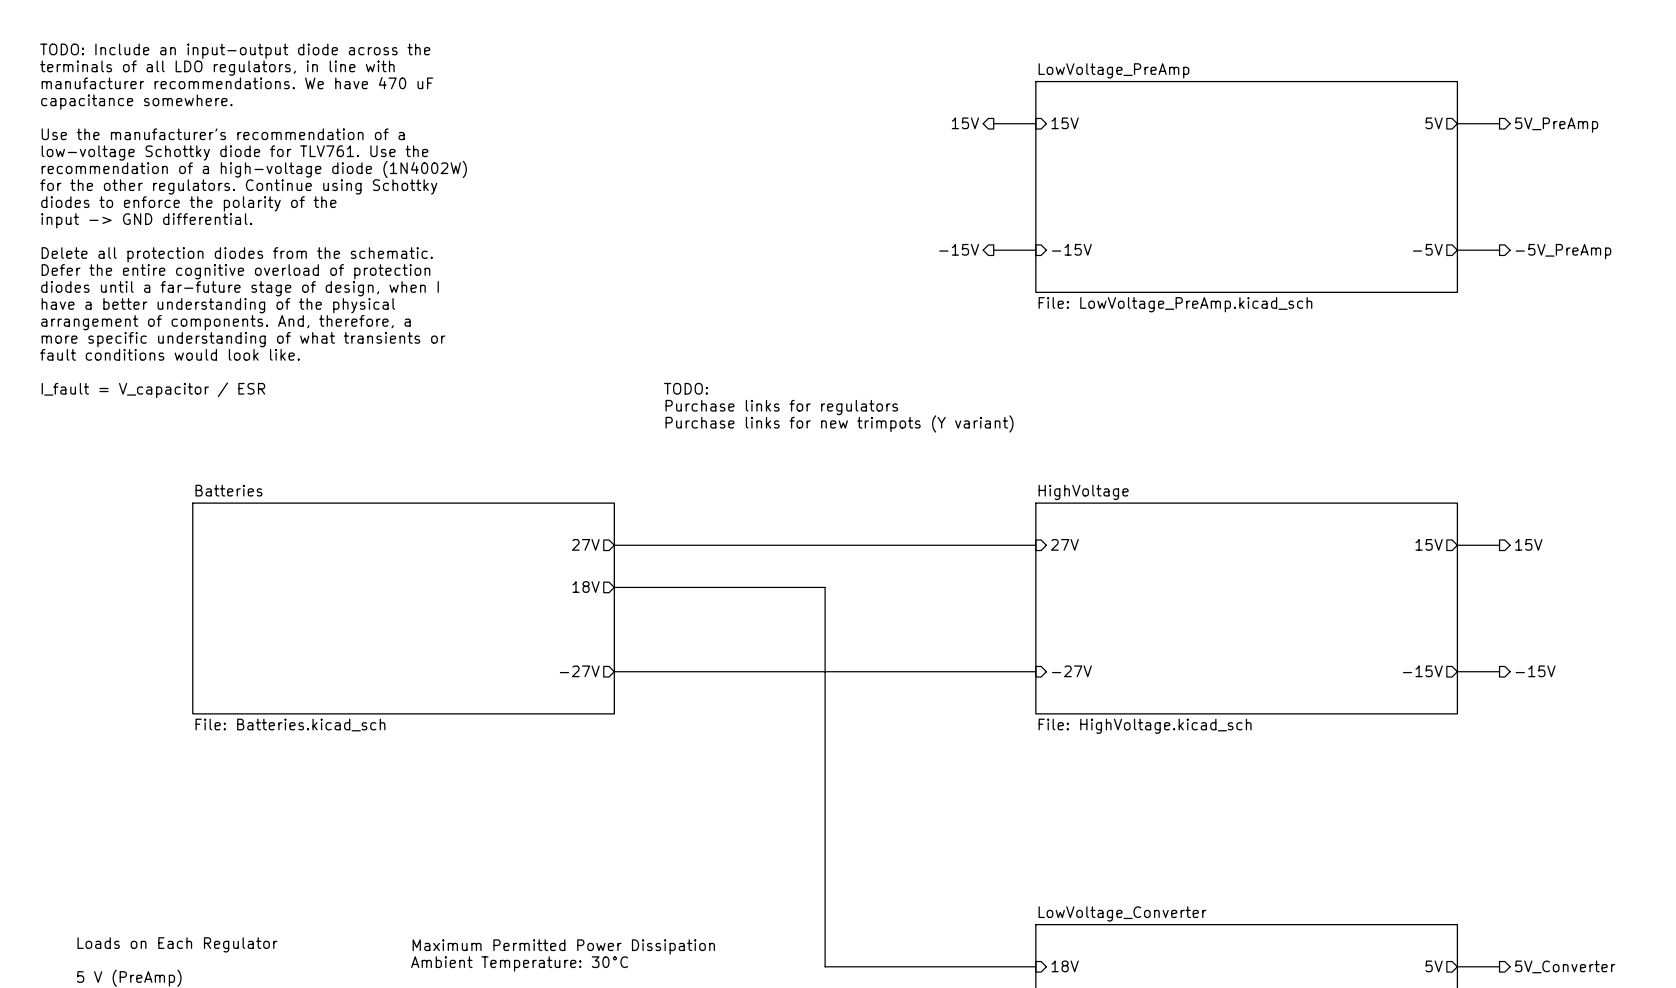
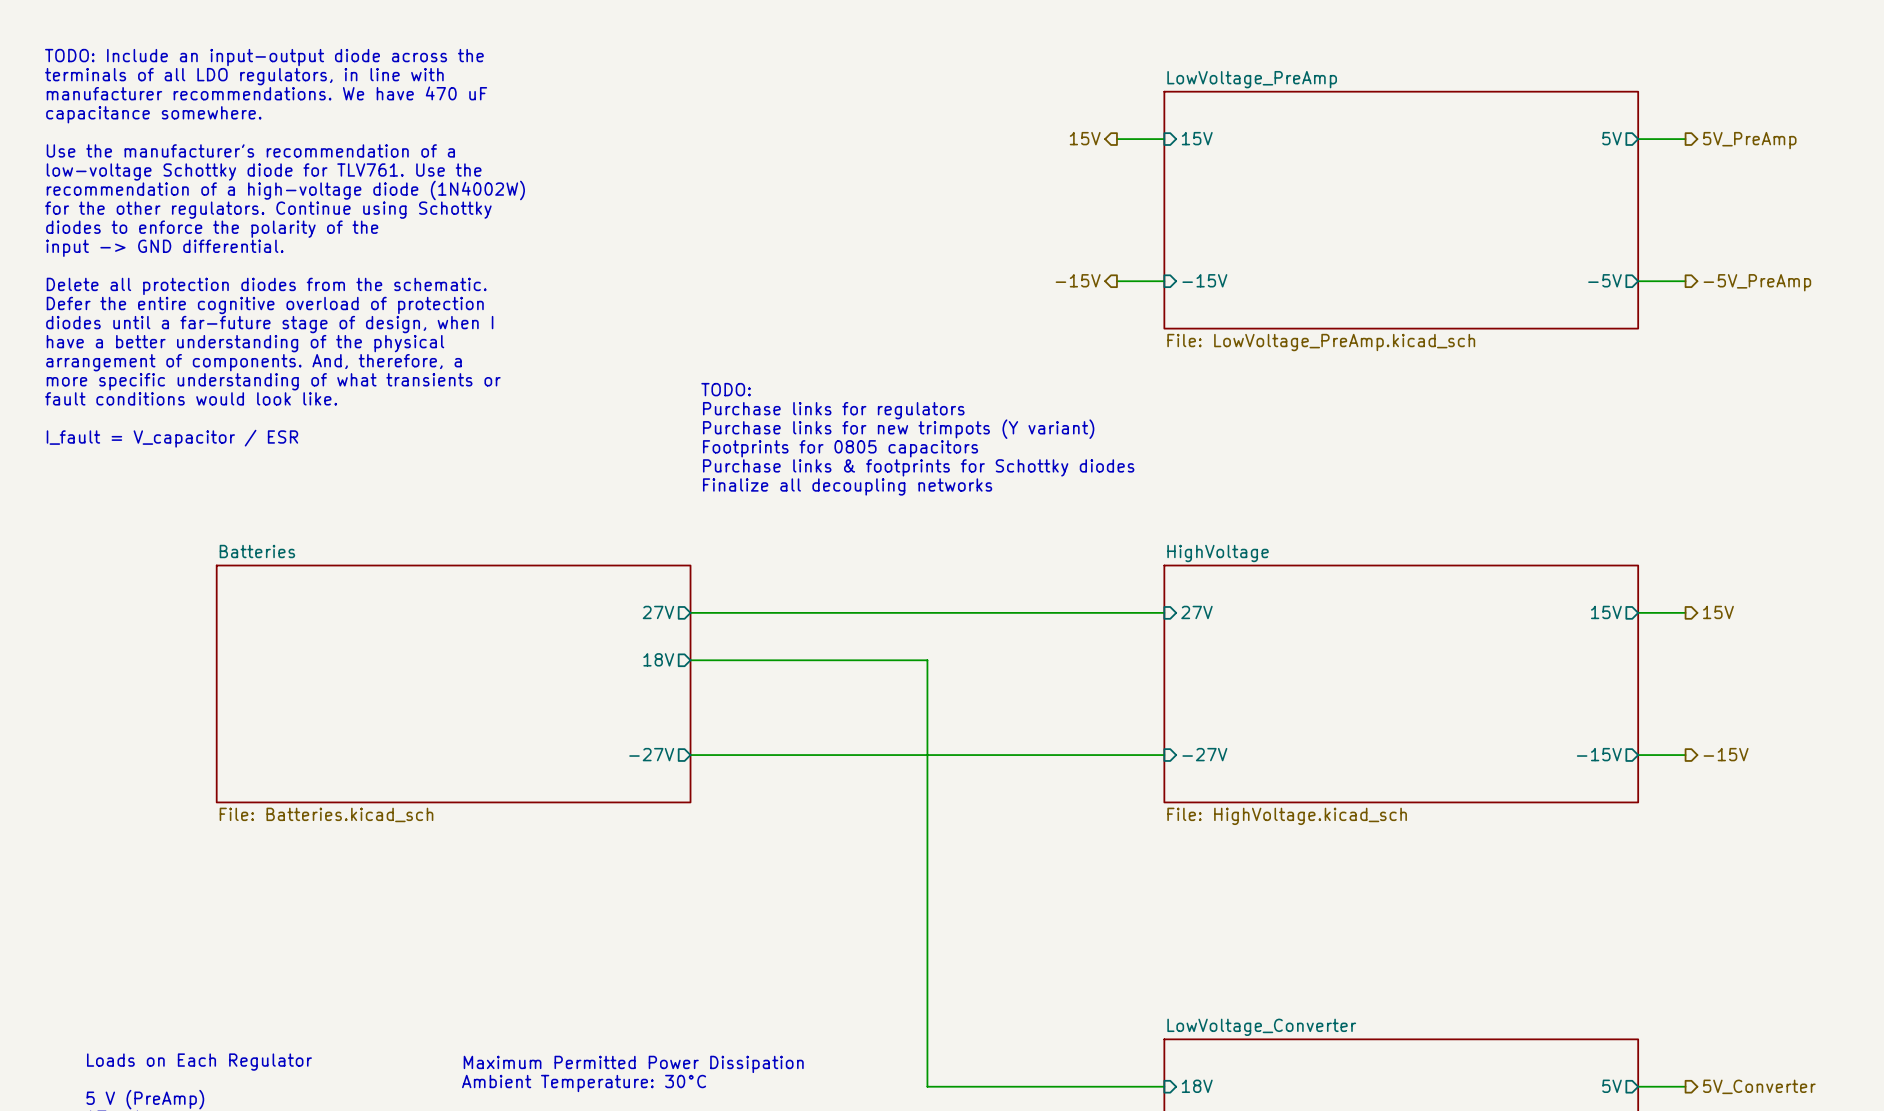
text position: TODO: (685, 388) -> TODO: (726, 389)
text: none -> Footprints for 0805 capacitors (840, 448)
text position: Purchase links for regulators (781, 407) -> Purchase links for regulators (833, 410)
text: none -> Purchase links & footprints for Schottky diodes (918, 467)
text position: Purchase links for new trimpots (Y variant) (839, 423) -> Purchase links for new trimpots (Y variant) (898, 429)
text: none -> Finalize all decoupling networks (847, 486)

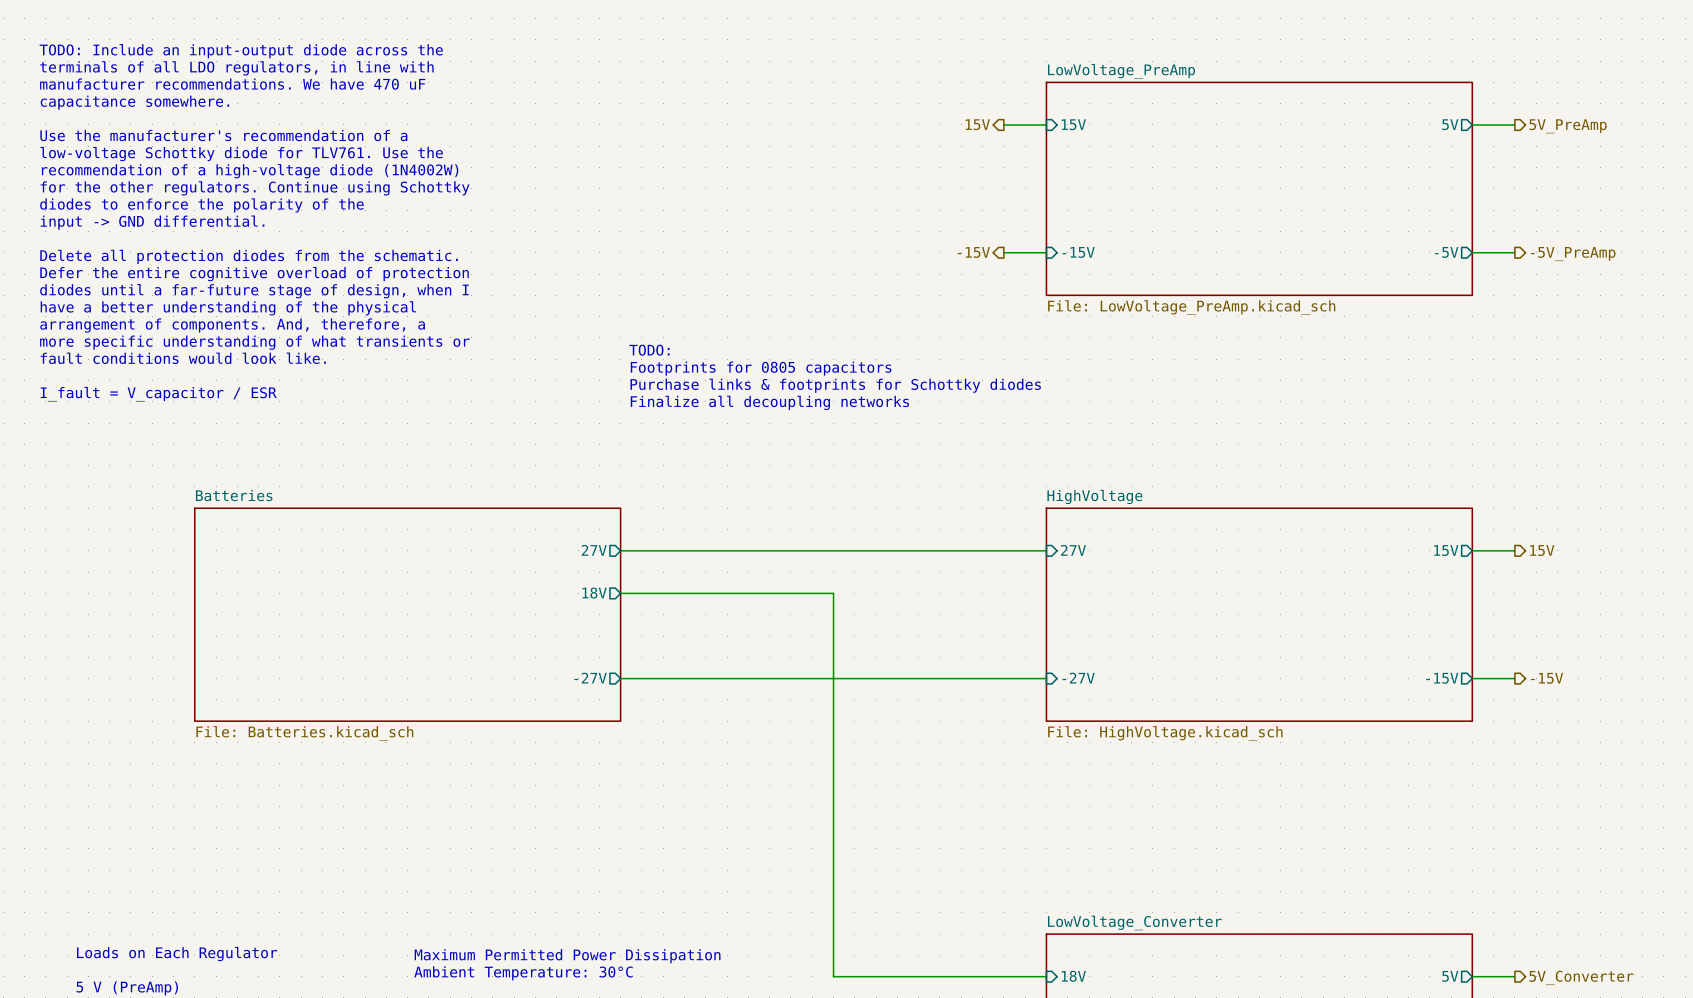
text: Purchase links for regulators (833, 410) -> Footprints for 0805 capacitors (761, 368)
text: Purchase links for new trimpots (Y variant) (898, 429) -> Purchase links & footprints for Schottky diodes (835, 385)
text: Footprints for 0805 capacitors (840, 448) -> Finalize all decoupling networks (769, 402)
text: Purchase links & footprints for Schottky diodes (918, 467) -> none
text: Finalize all decoupling networks (847, 486) -> none

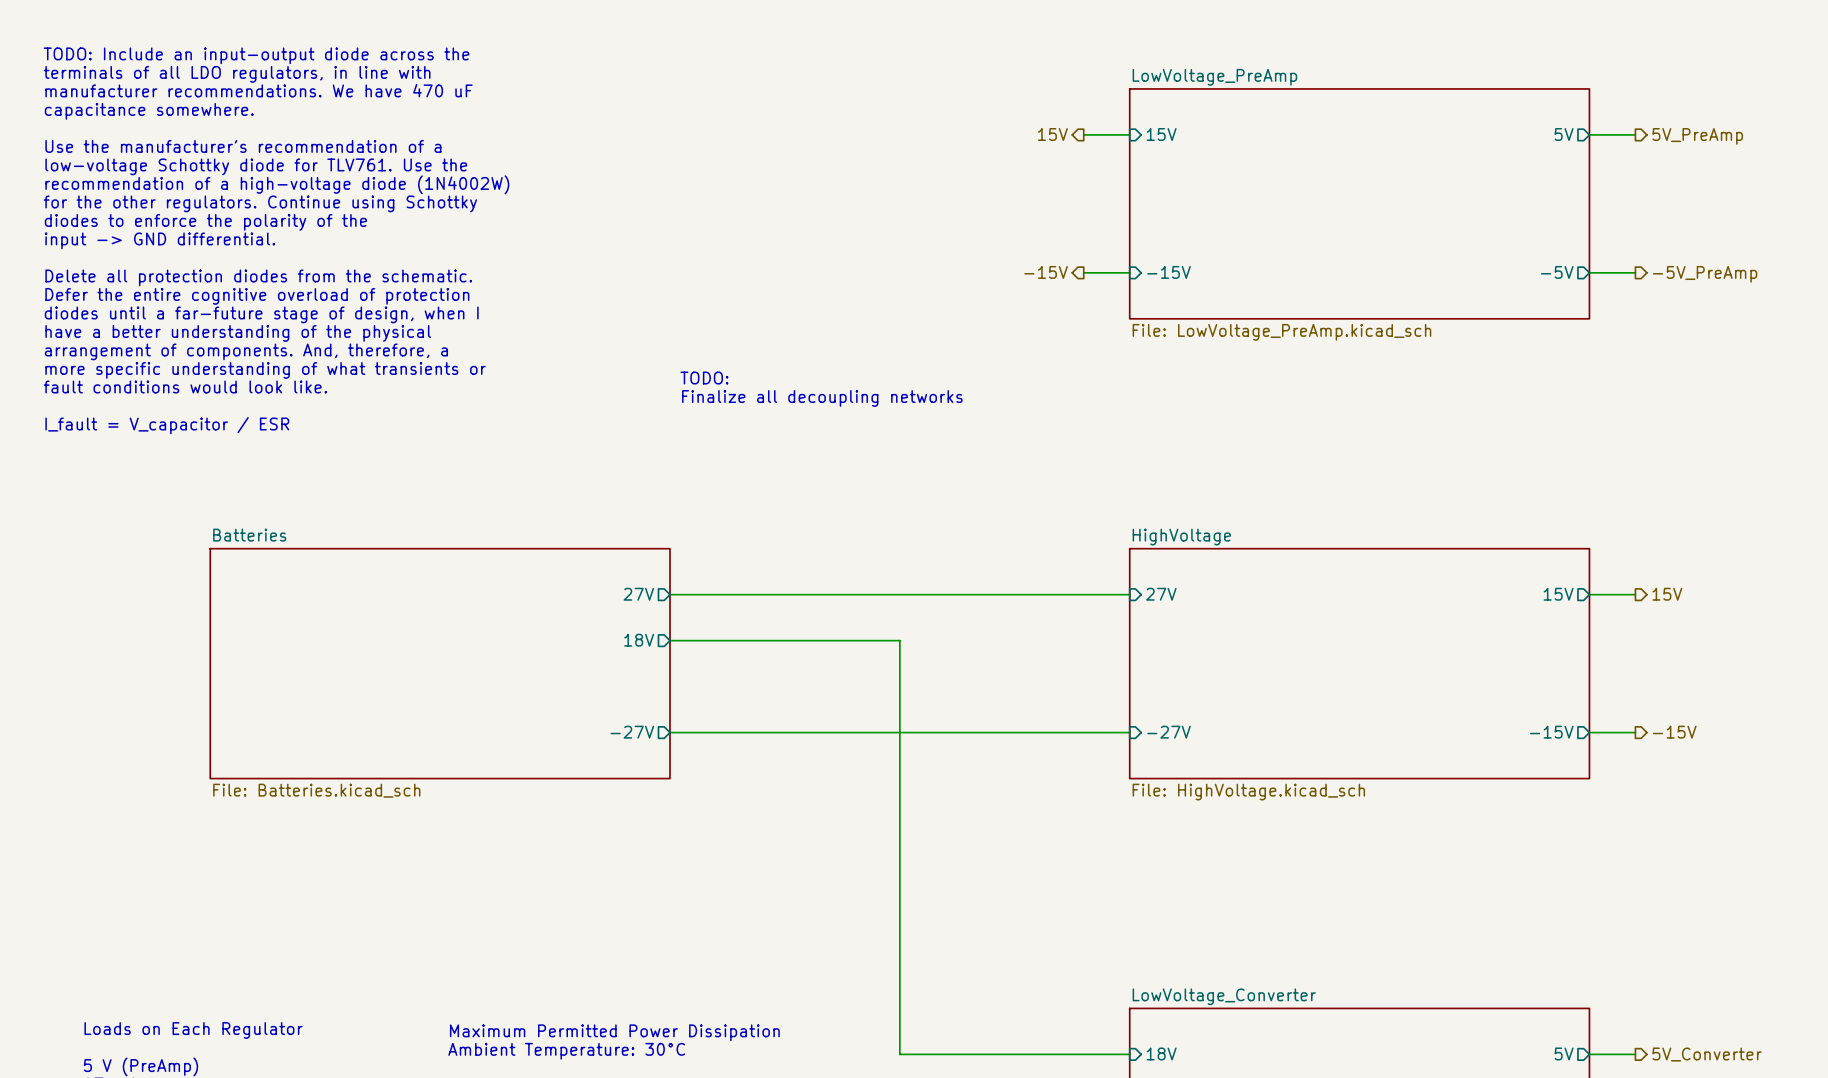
text: Footprints for 0805 capacitors (761, 368) -> Finalize all decoupling networks (822, 398)
text: Purchase links & footprints for Schottky diodes (835, 385) -> none
text: Finalize all decoupling networks (769, 402) -> none

